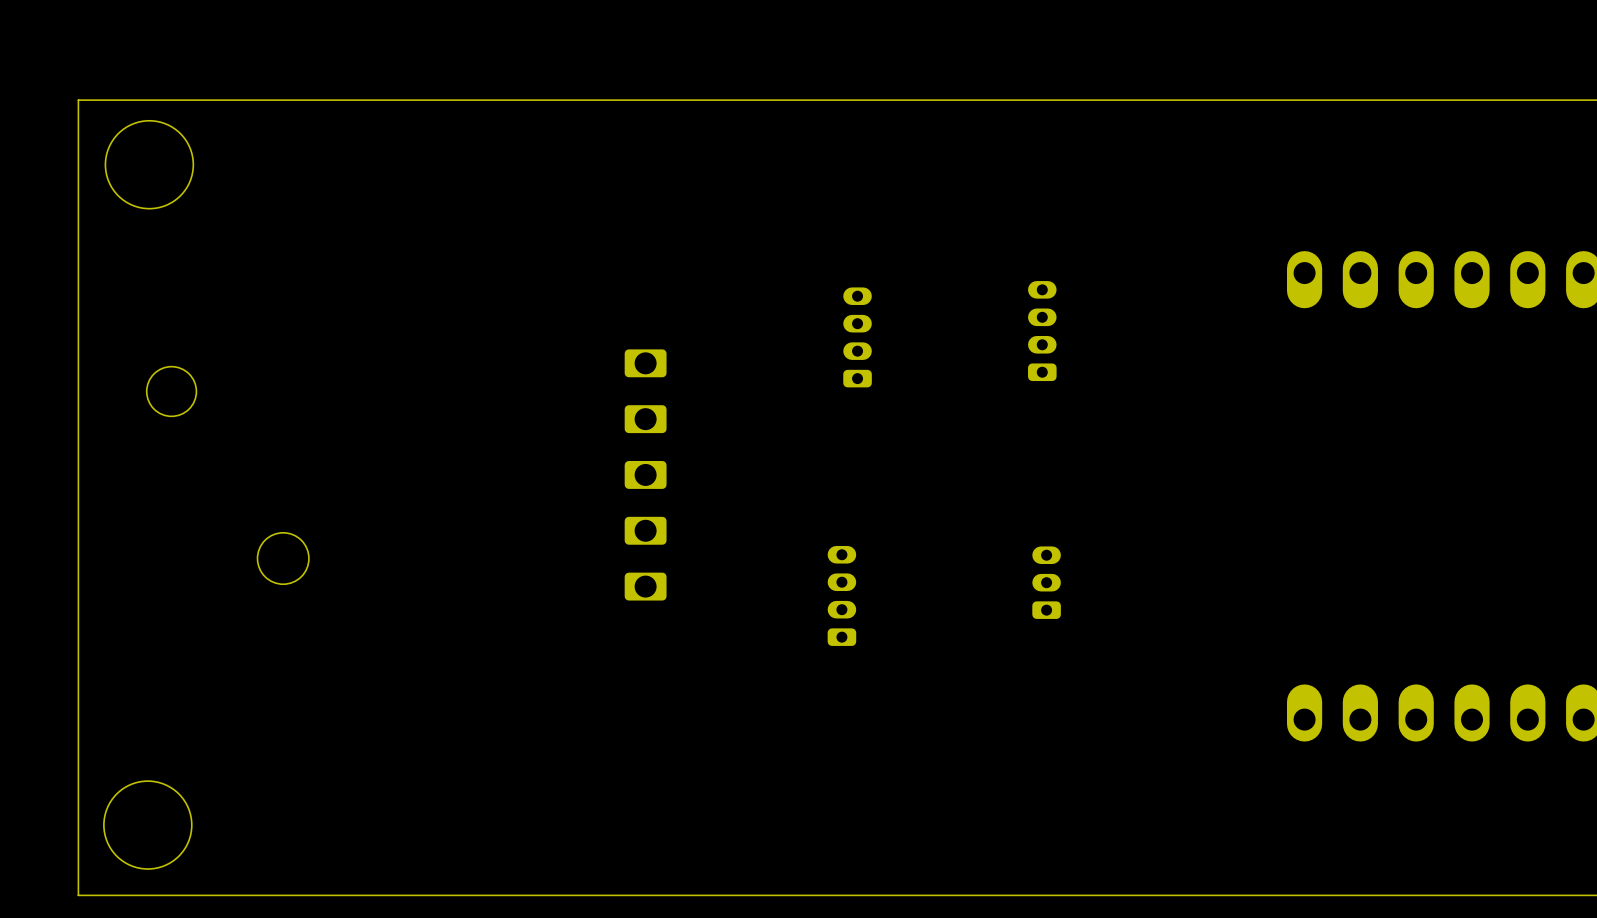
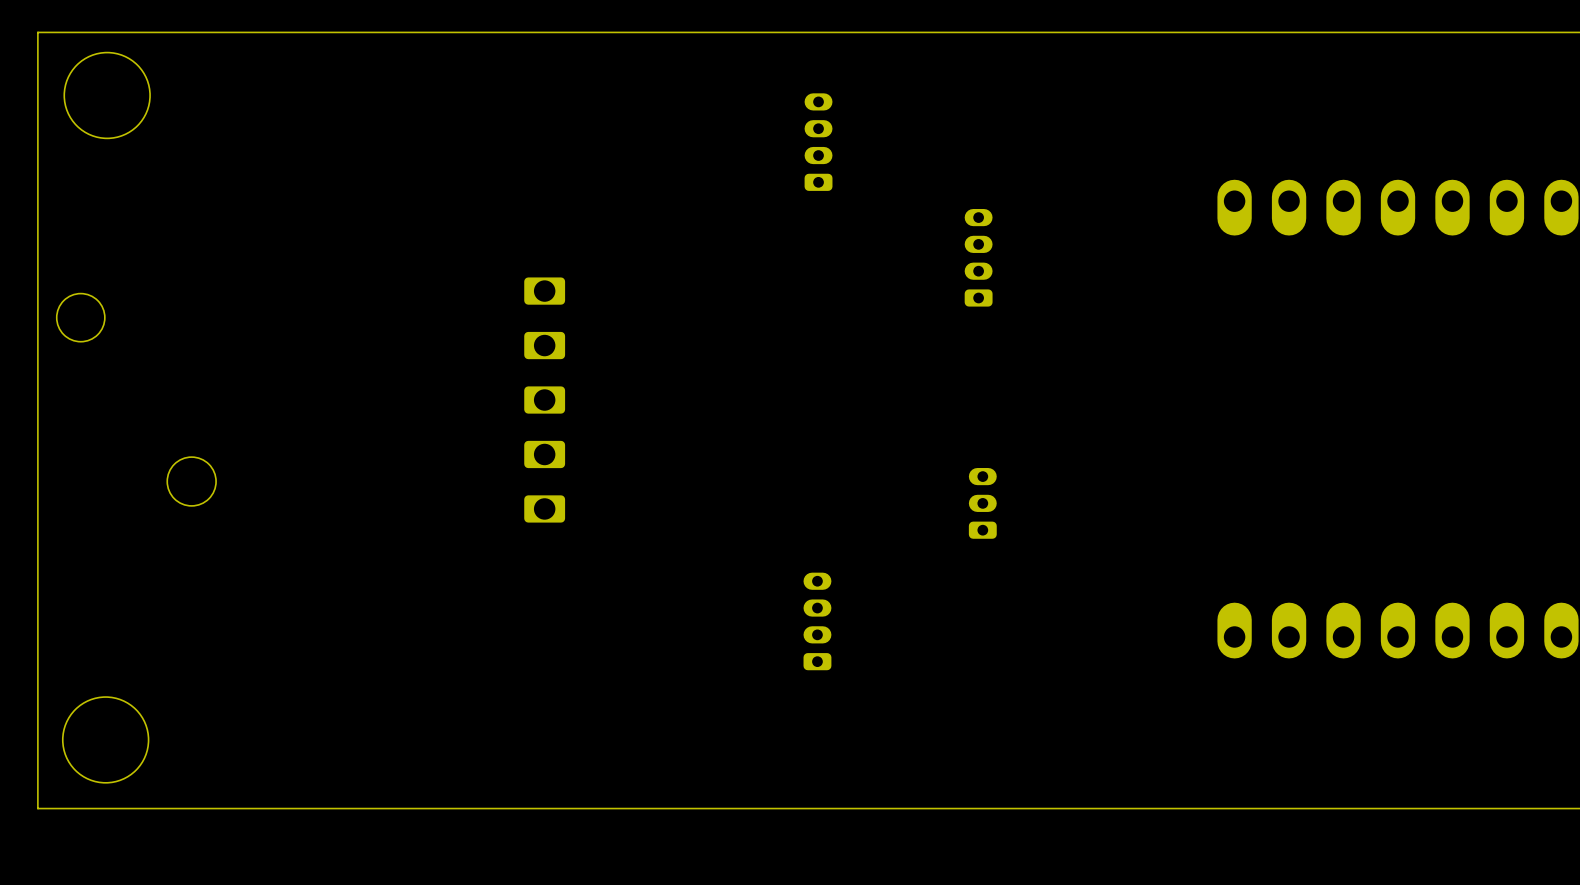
part position: (857, 337) -> (818, 142)
round board edge: [146, 366, 197, 417] -> none
round board edge: none -> [56, 293, 106, 343]
part position: (645, 474) -> (544, 400)
round board edge: [256, 532, 310, 585] -> none
round board edge: none -> [166, 456, 217, 507]
part position: (841, 595) -> (817, 621)

